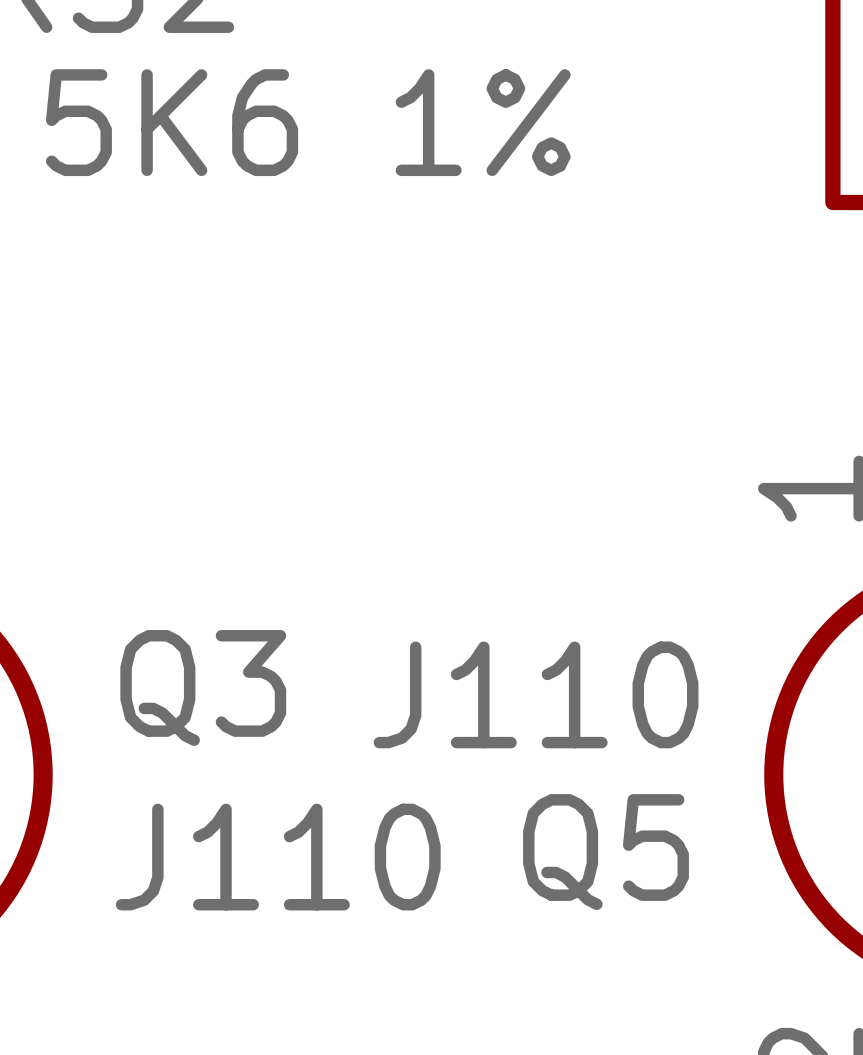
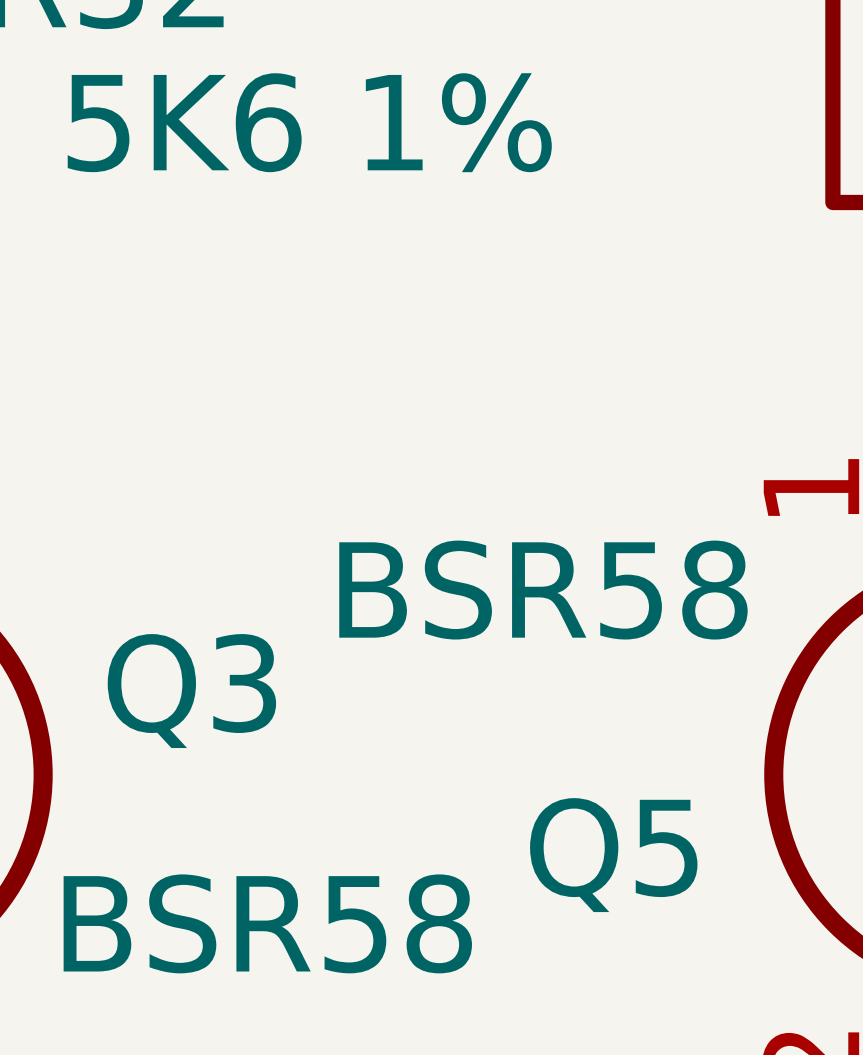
Q5 value: J110 (536, 694) -> BSR58 (543, 590)
Q3 value: J110 (278, 857) -> BSR58 (267, 923)

